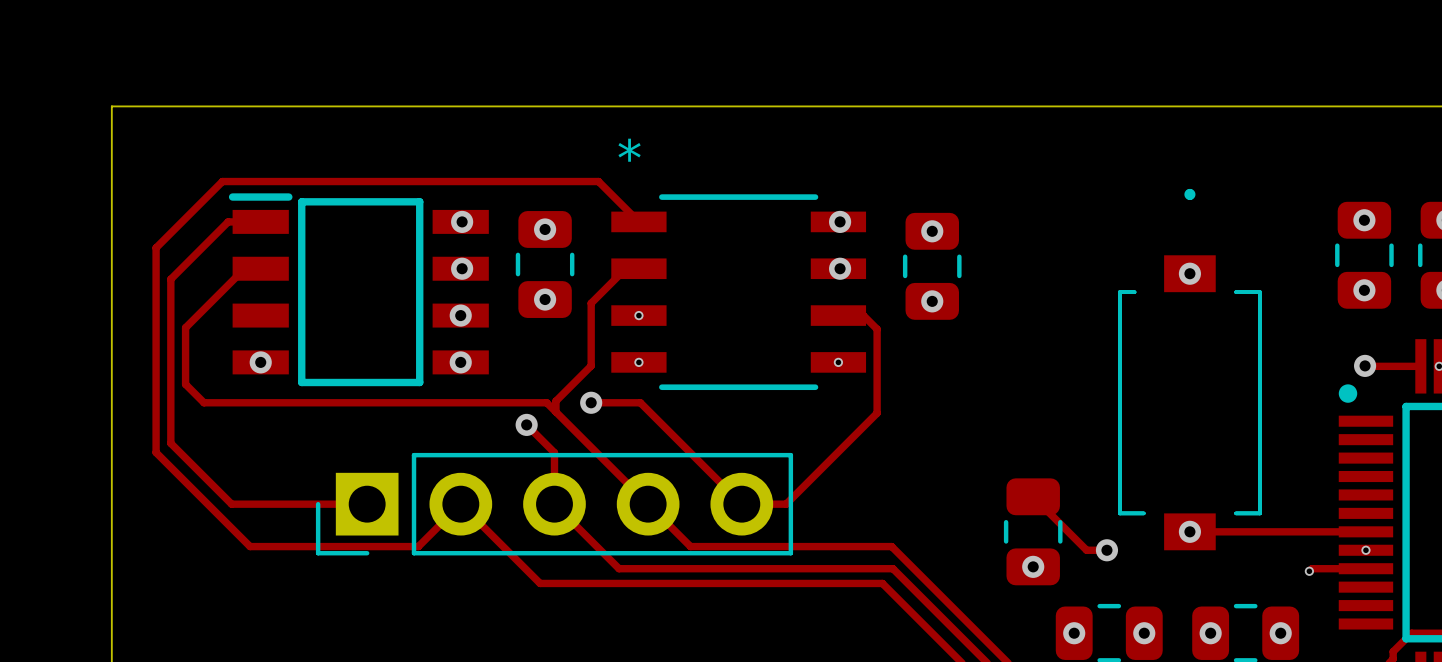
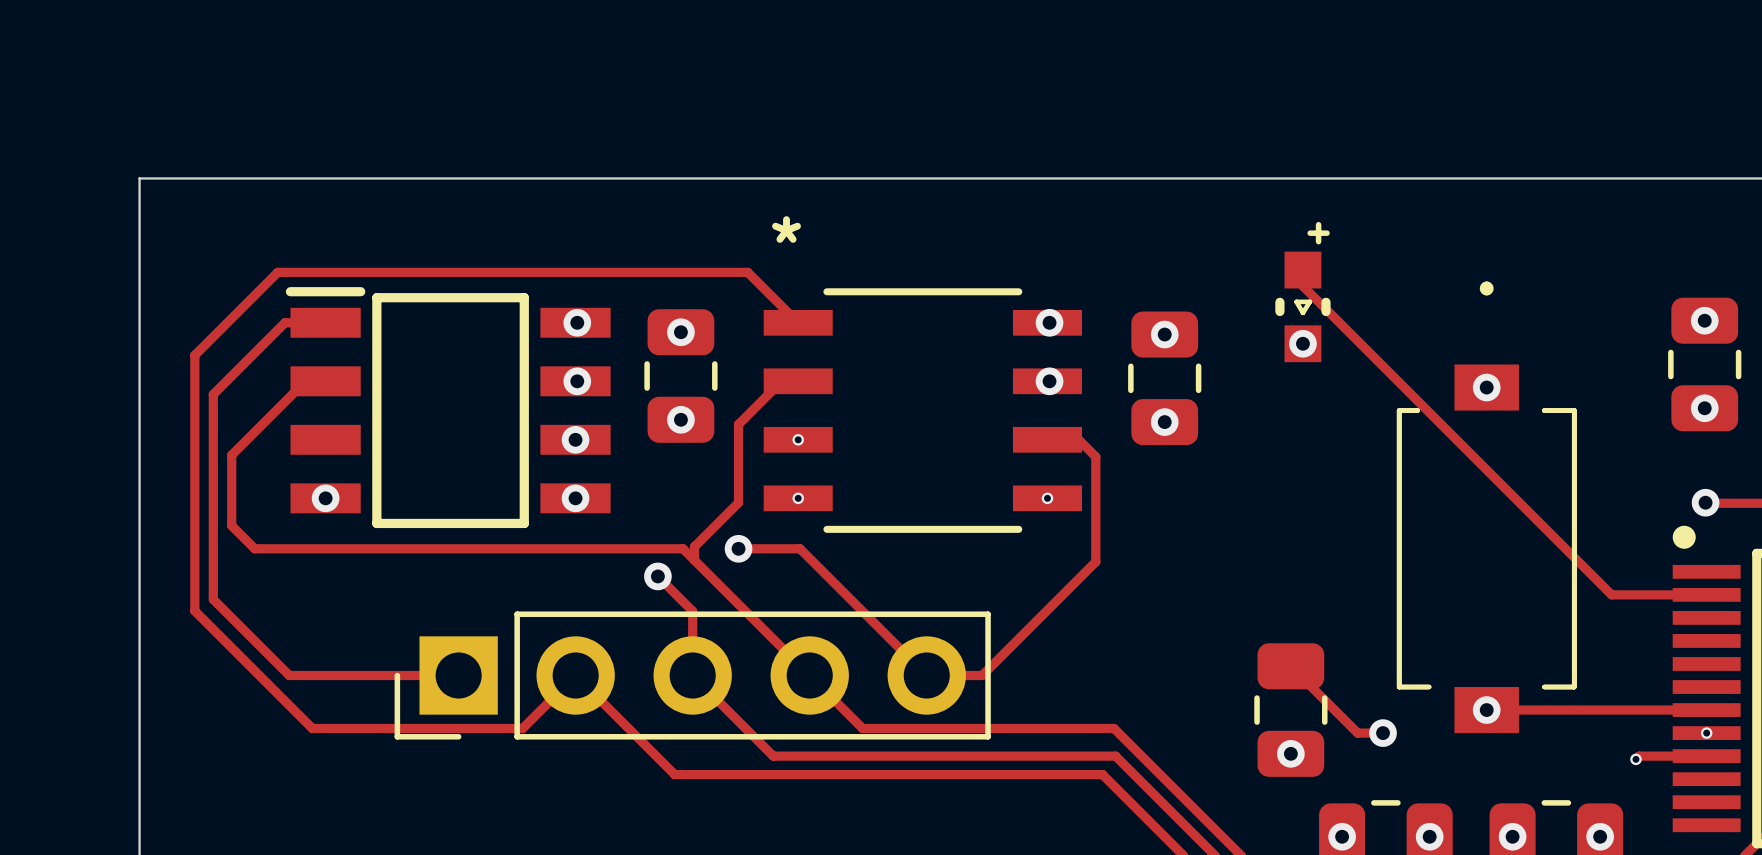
track: none -> (1302, 270) (1302, 286) (1611, 594) (1706, 594)
part: none -> (1302, 306)
via: none -> (1302, 343)

